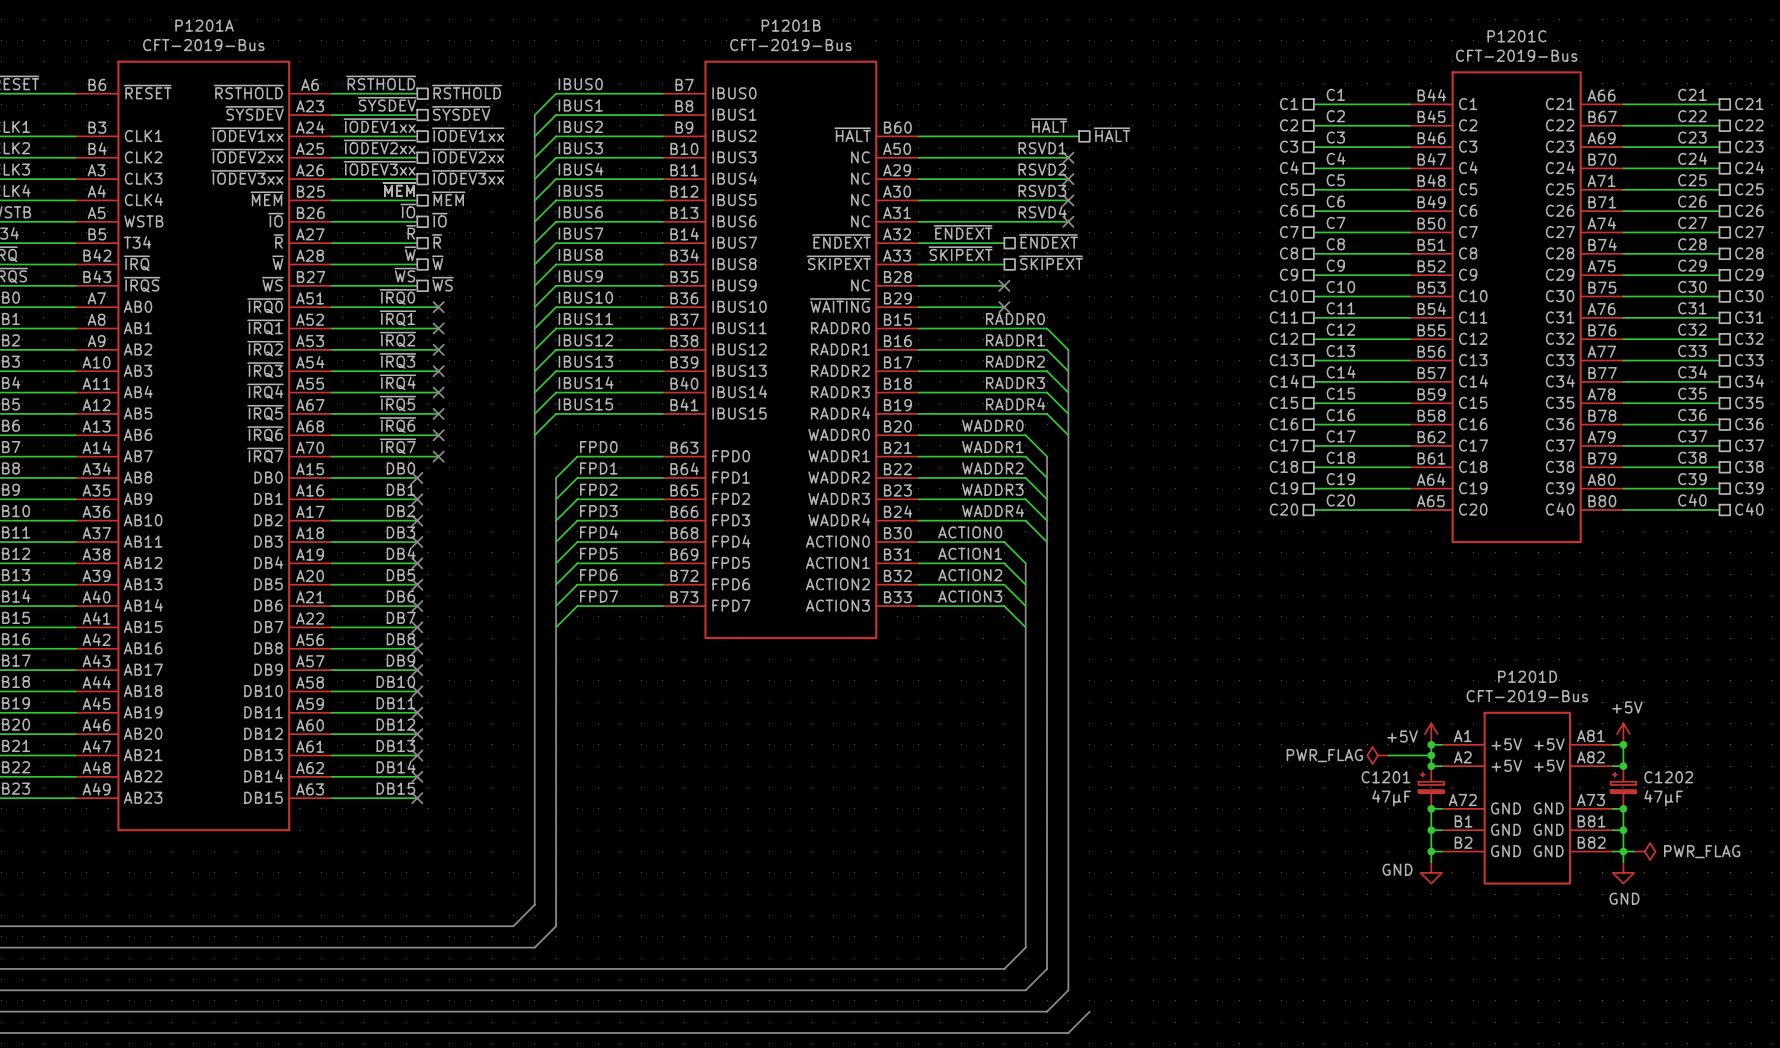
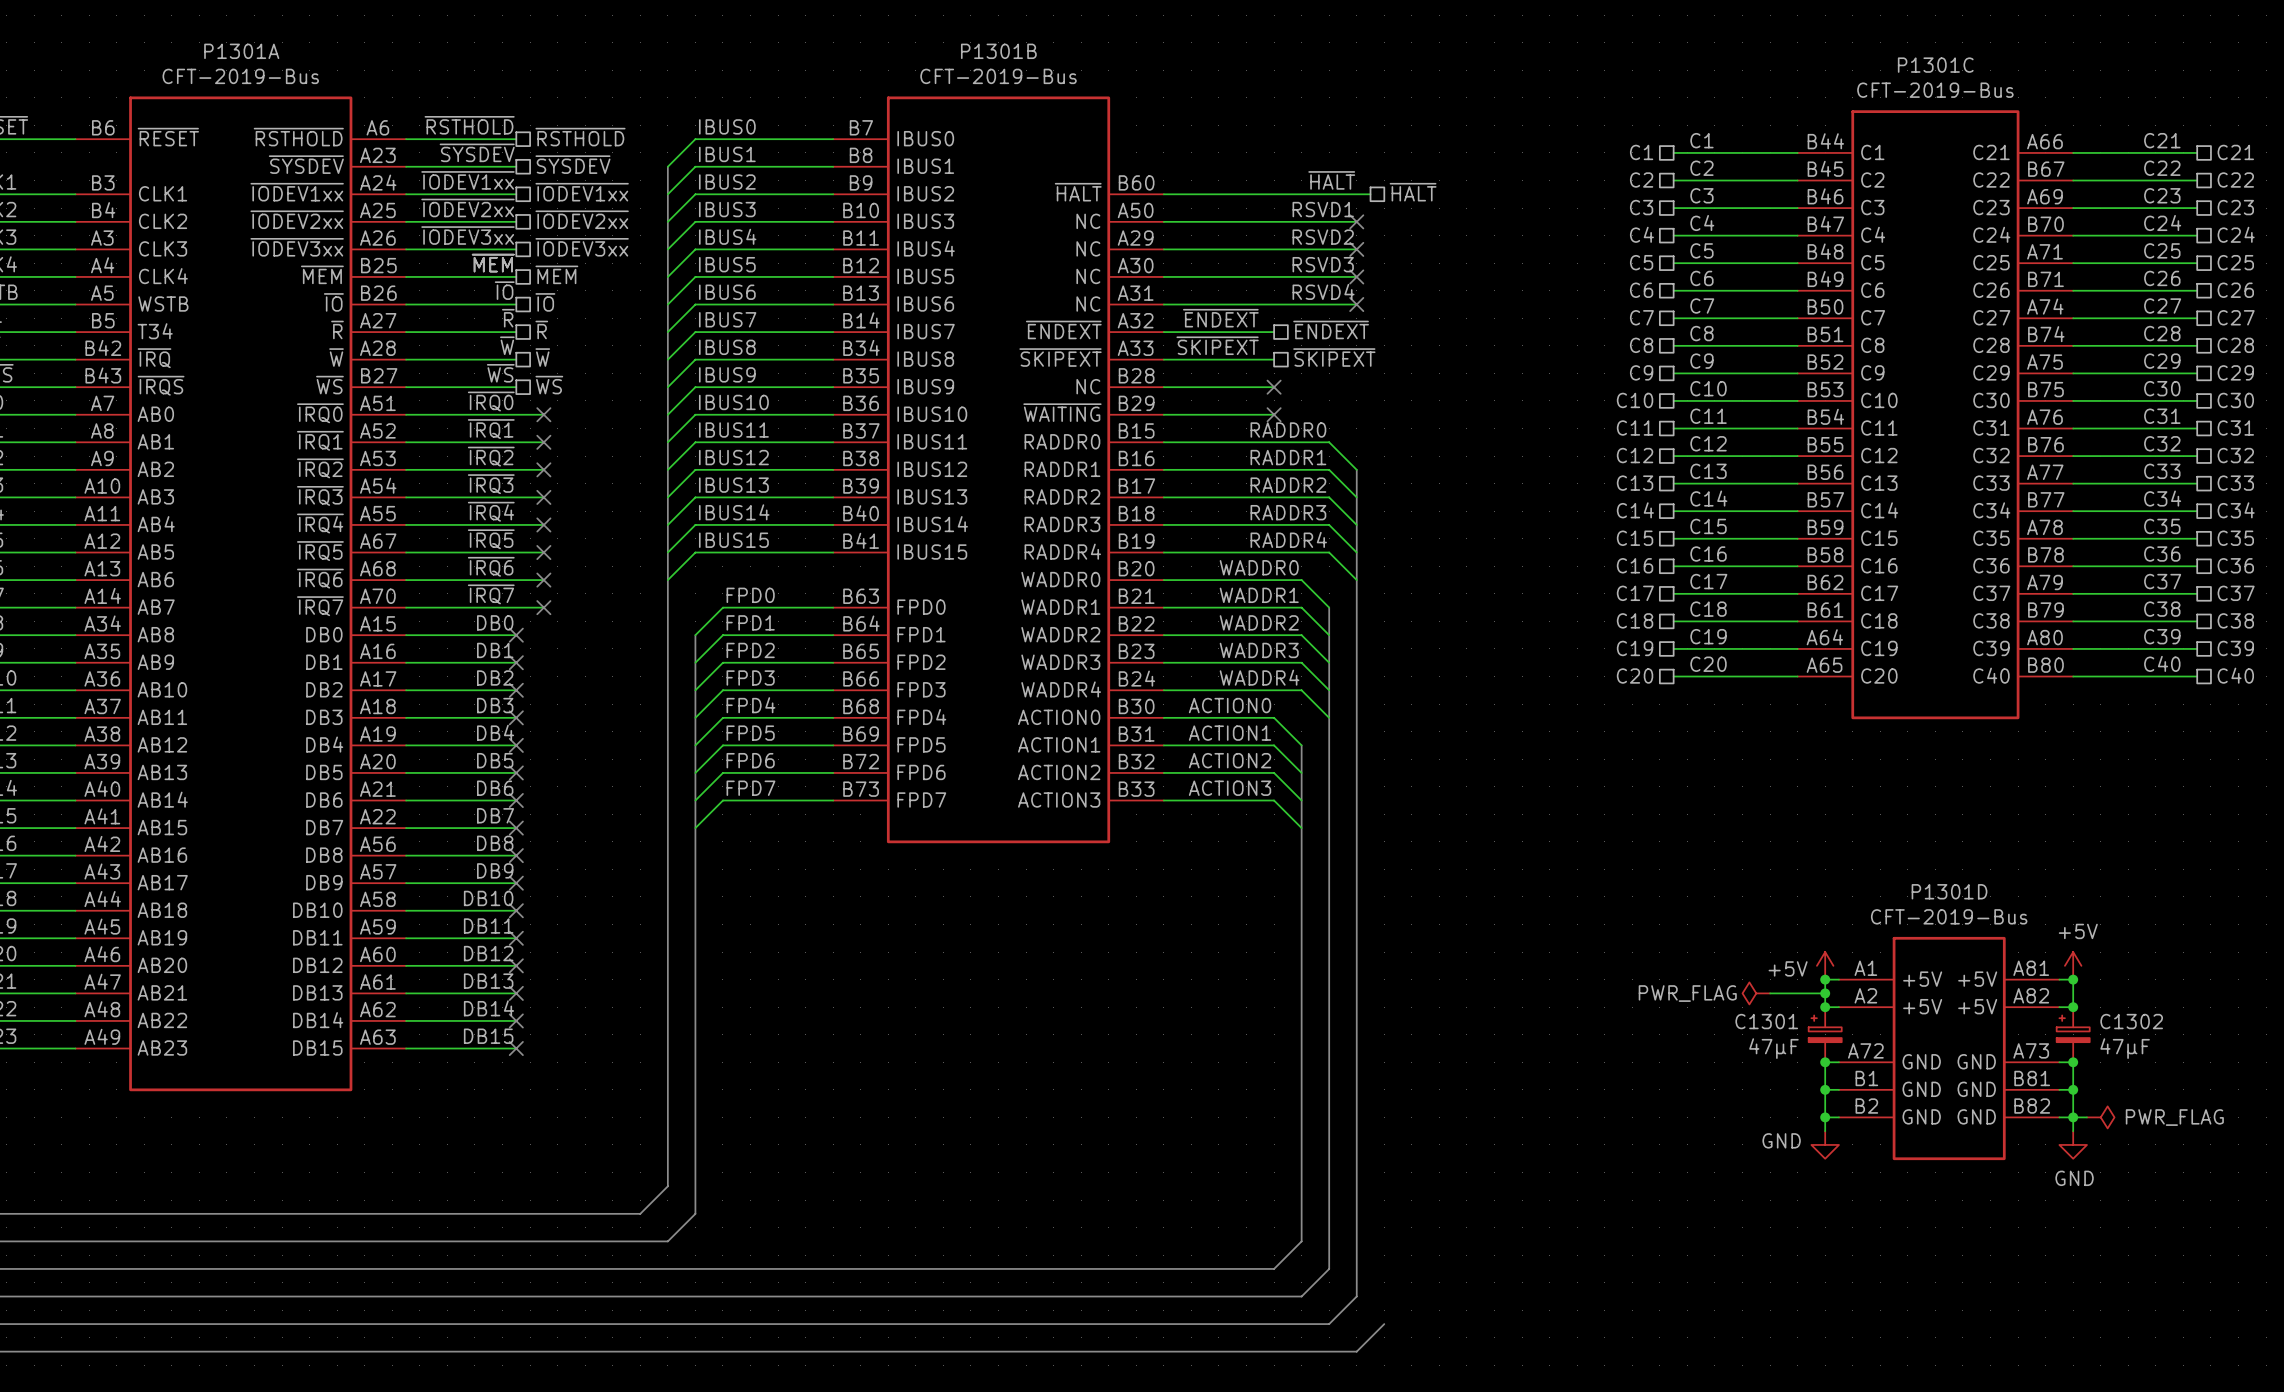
P1201A name: P1201A (204, 25) -> P1301A (241, 51)
P1201B name: P1201B (791, 25) -> P1301B (998, 51)
P1201C name: P1201C (1516, 36) -> P1301C (1935, 65)
P1201D name: P1201D (1527, 676) -> P1301D (1949, 891)
C1201 name: C1201 (1386, 777) -> C1301 (1766, 1021)
C1202 name: C1202 (1668, 777) -> C1302 (2131, 1021)

